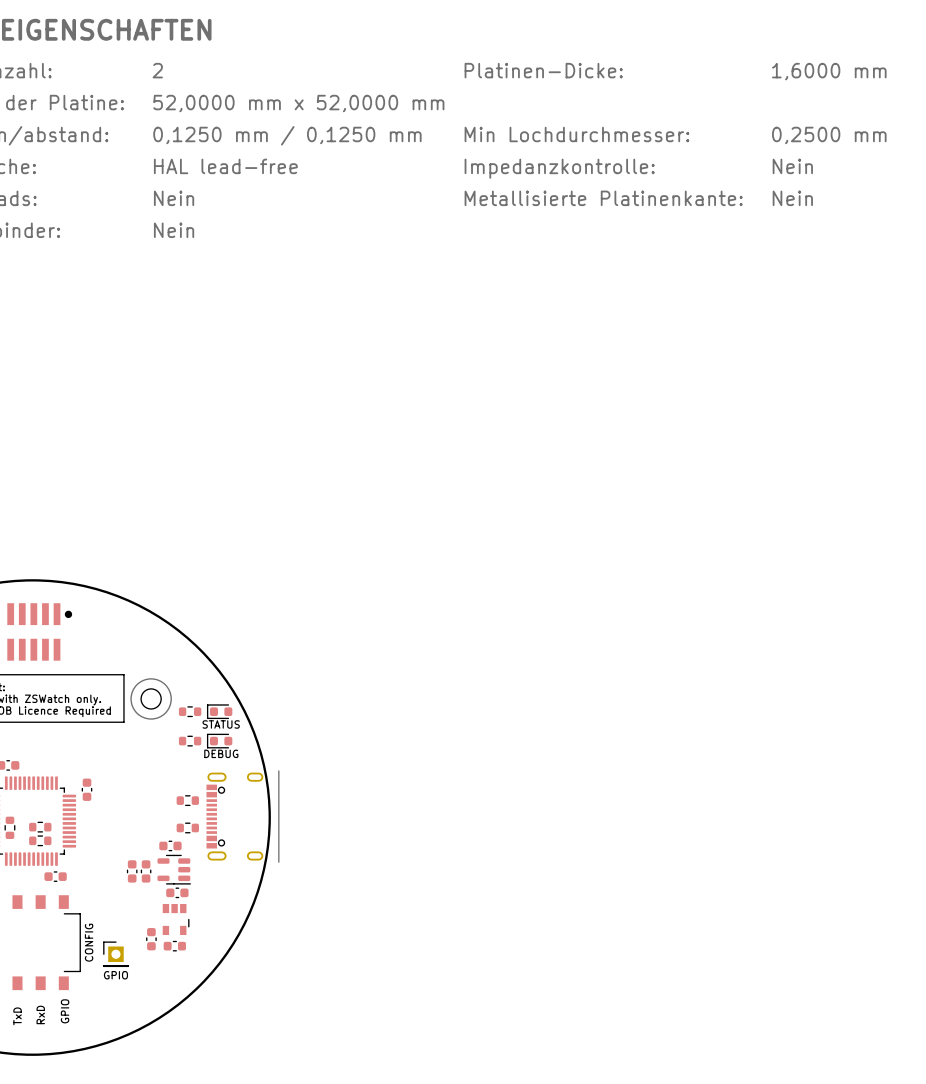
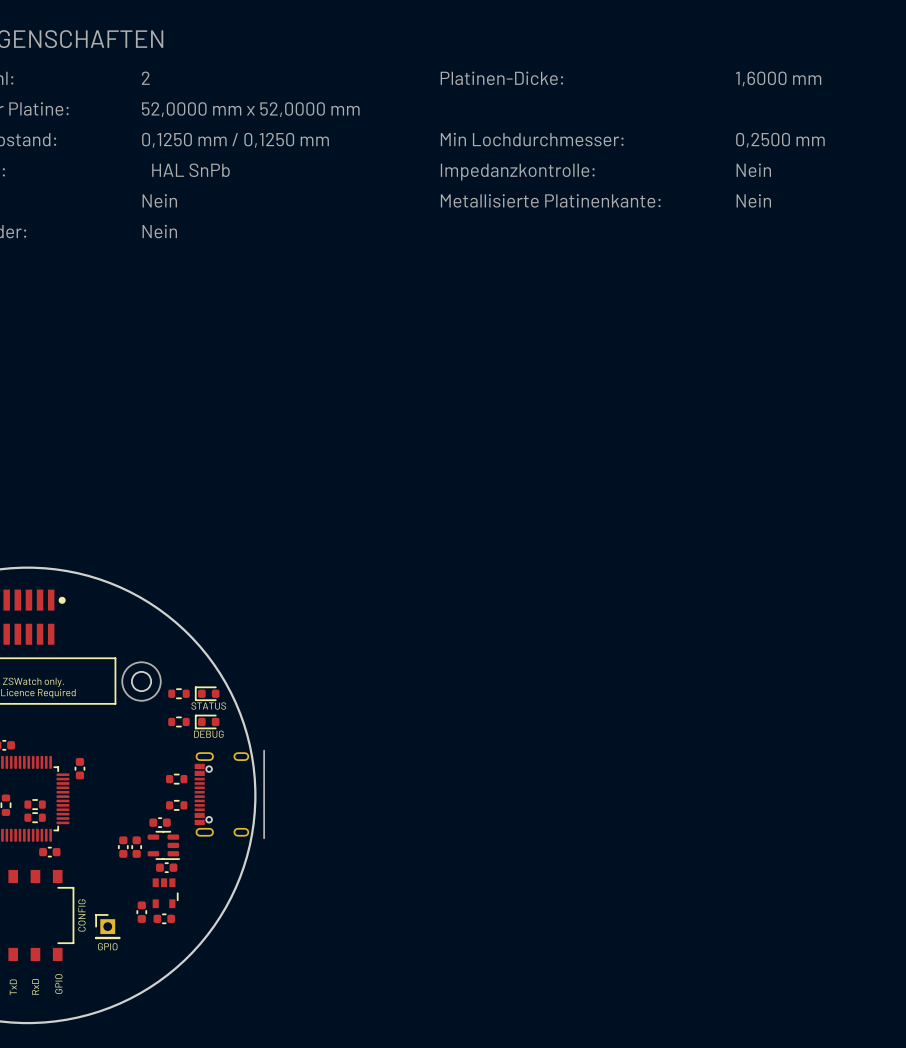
text: none -> HAL SnPb (190, 170)
text: HAL lead-free (225, 166) -> none

